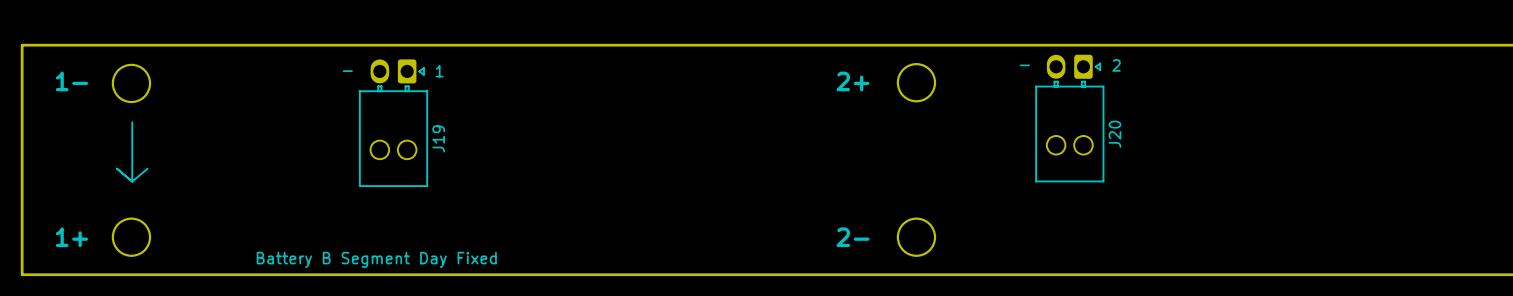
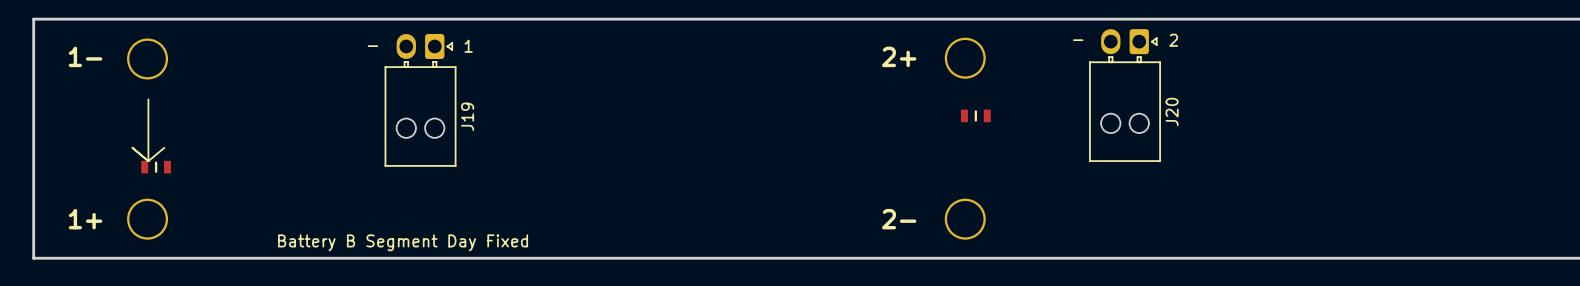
part: none -> (975, 115)
part: none -> (156, 167)

